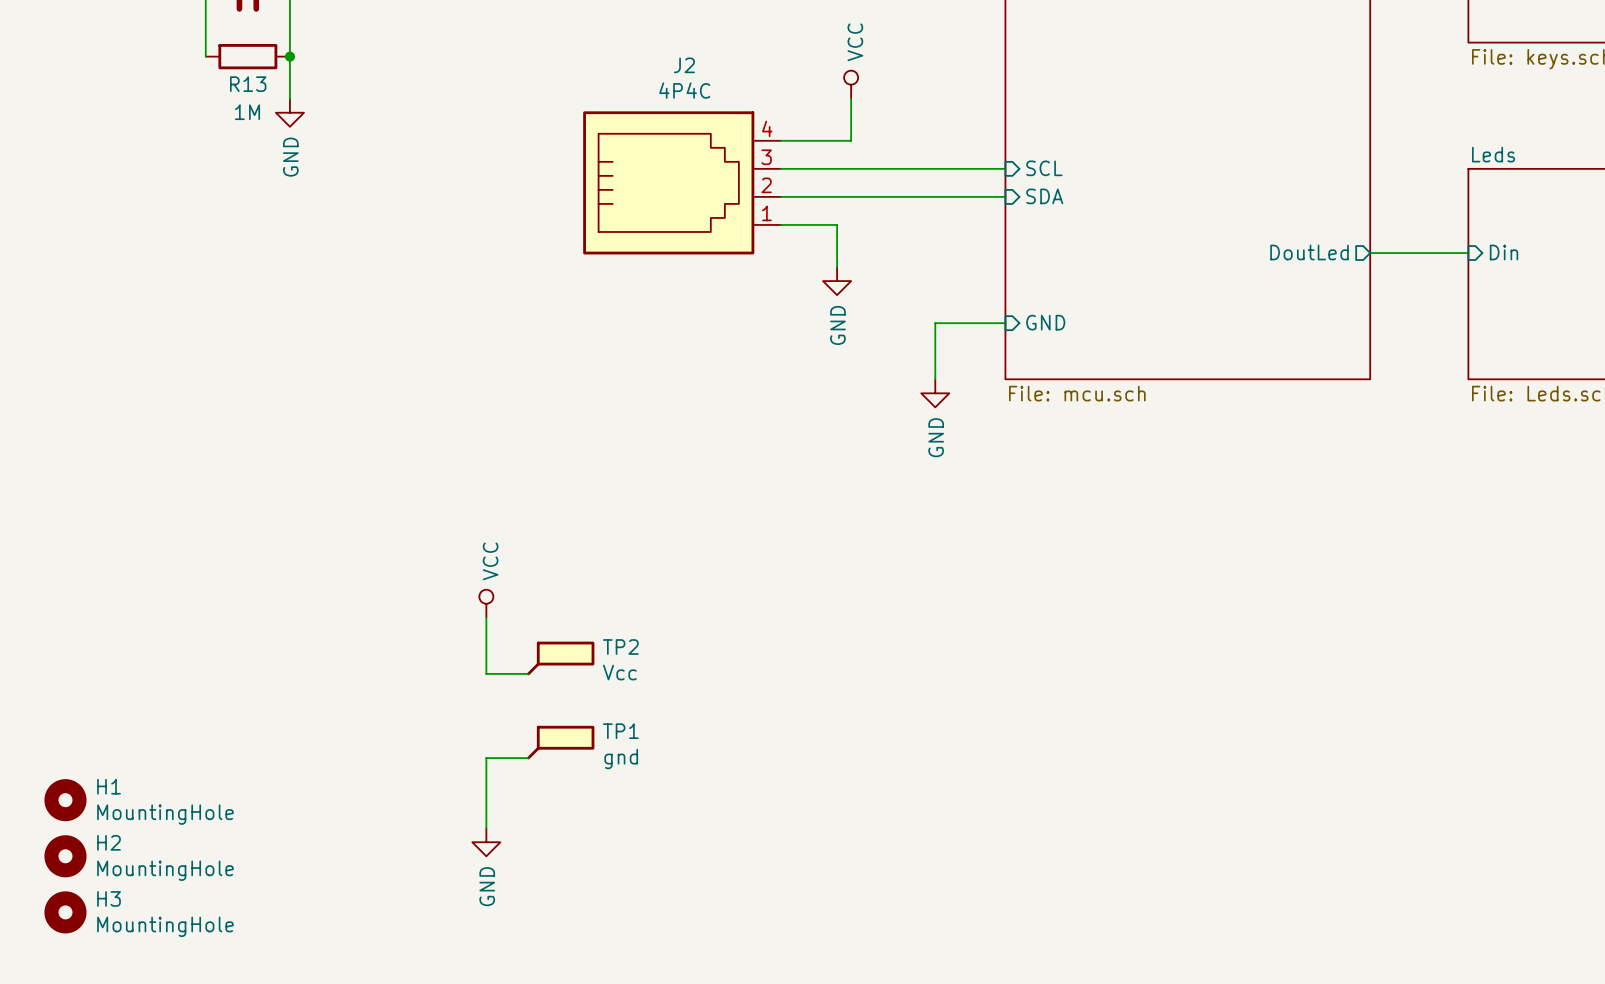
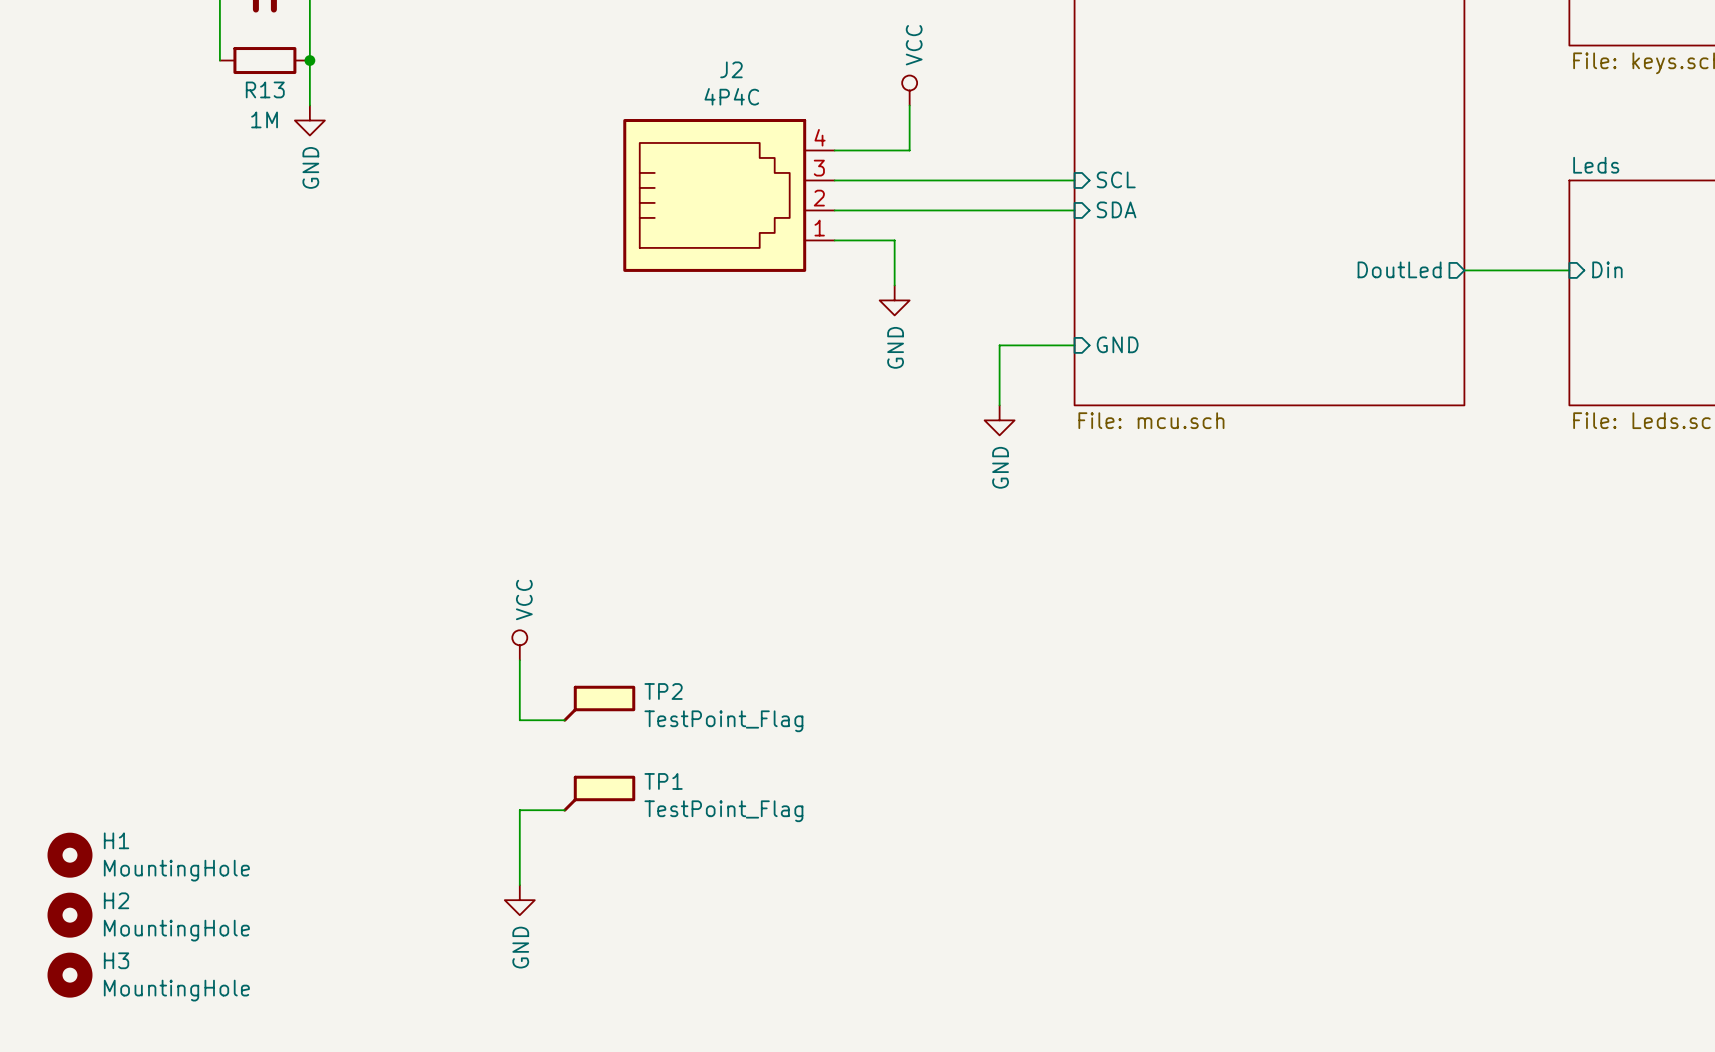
TP2 value: Vcc (619, 672) -> TestPoint_Flag (723, 721)
TP1 value: gnd (621, 759) -> TestPoint_Flag (723, 811)

